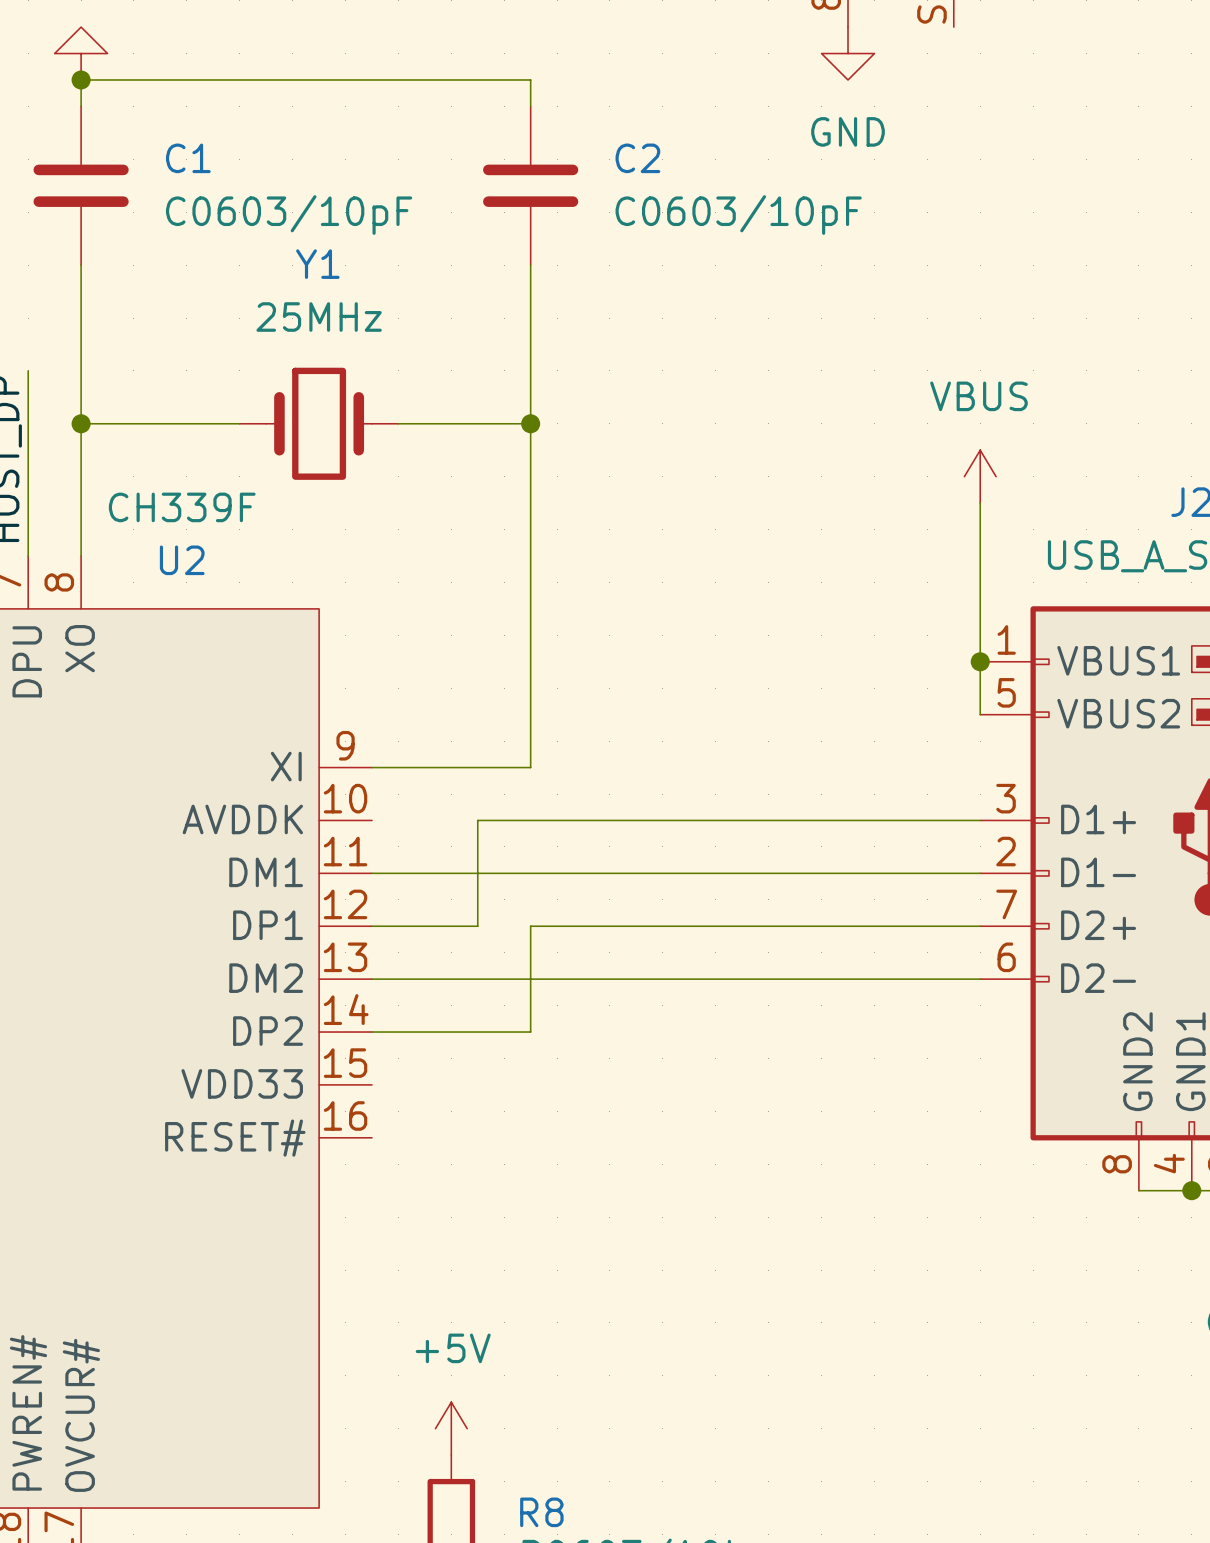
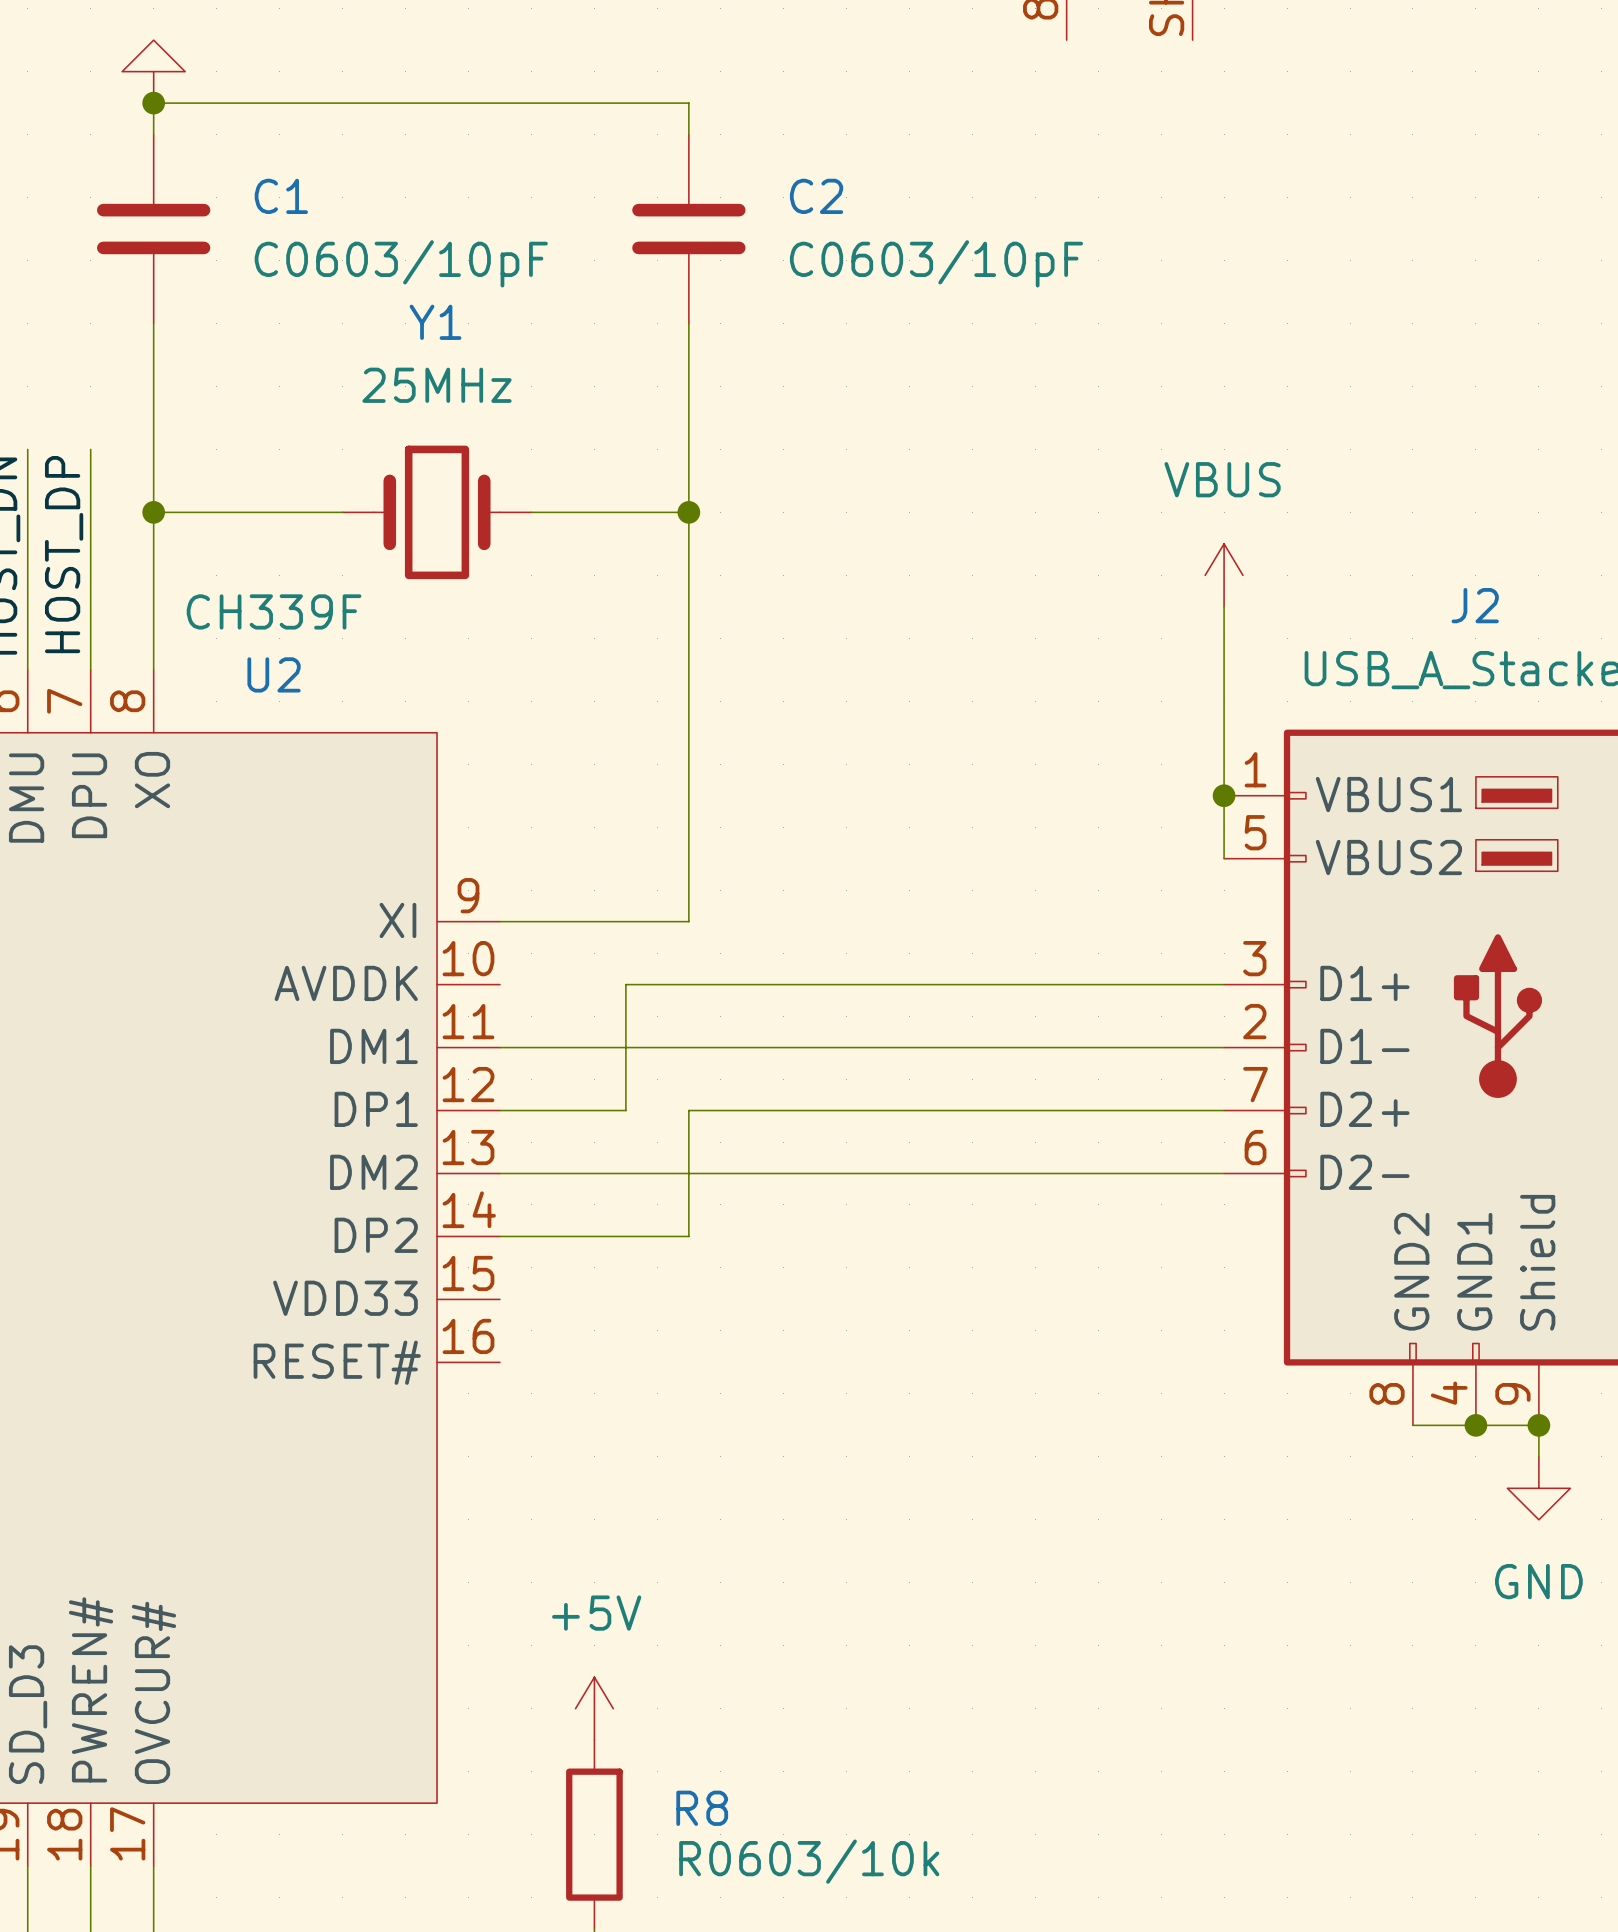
power symbol: GND (848, 53) -> none

